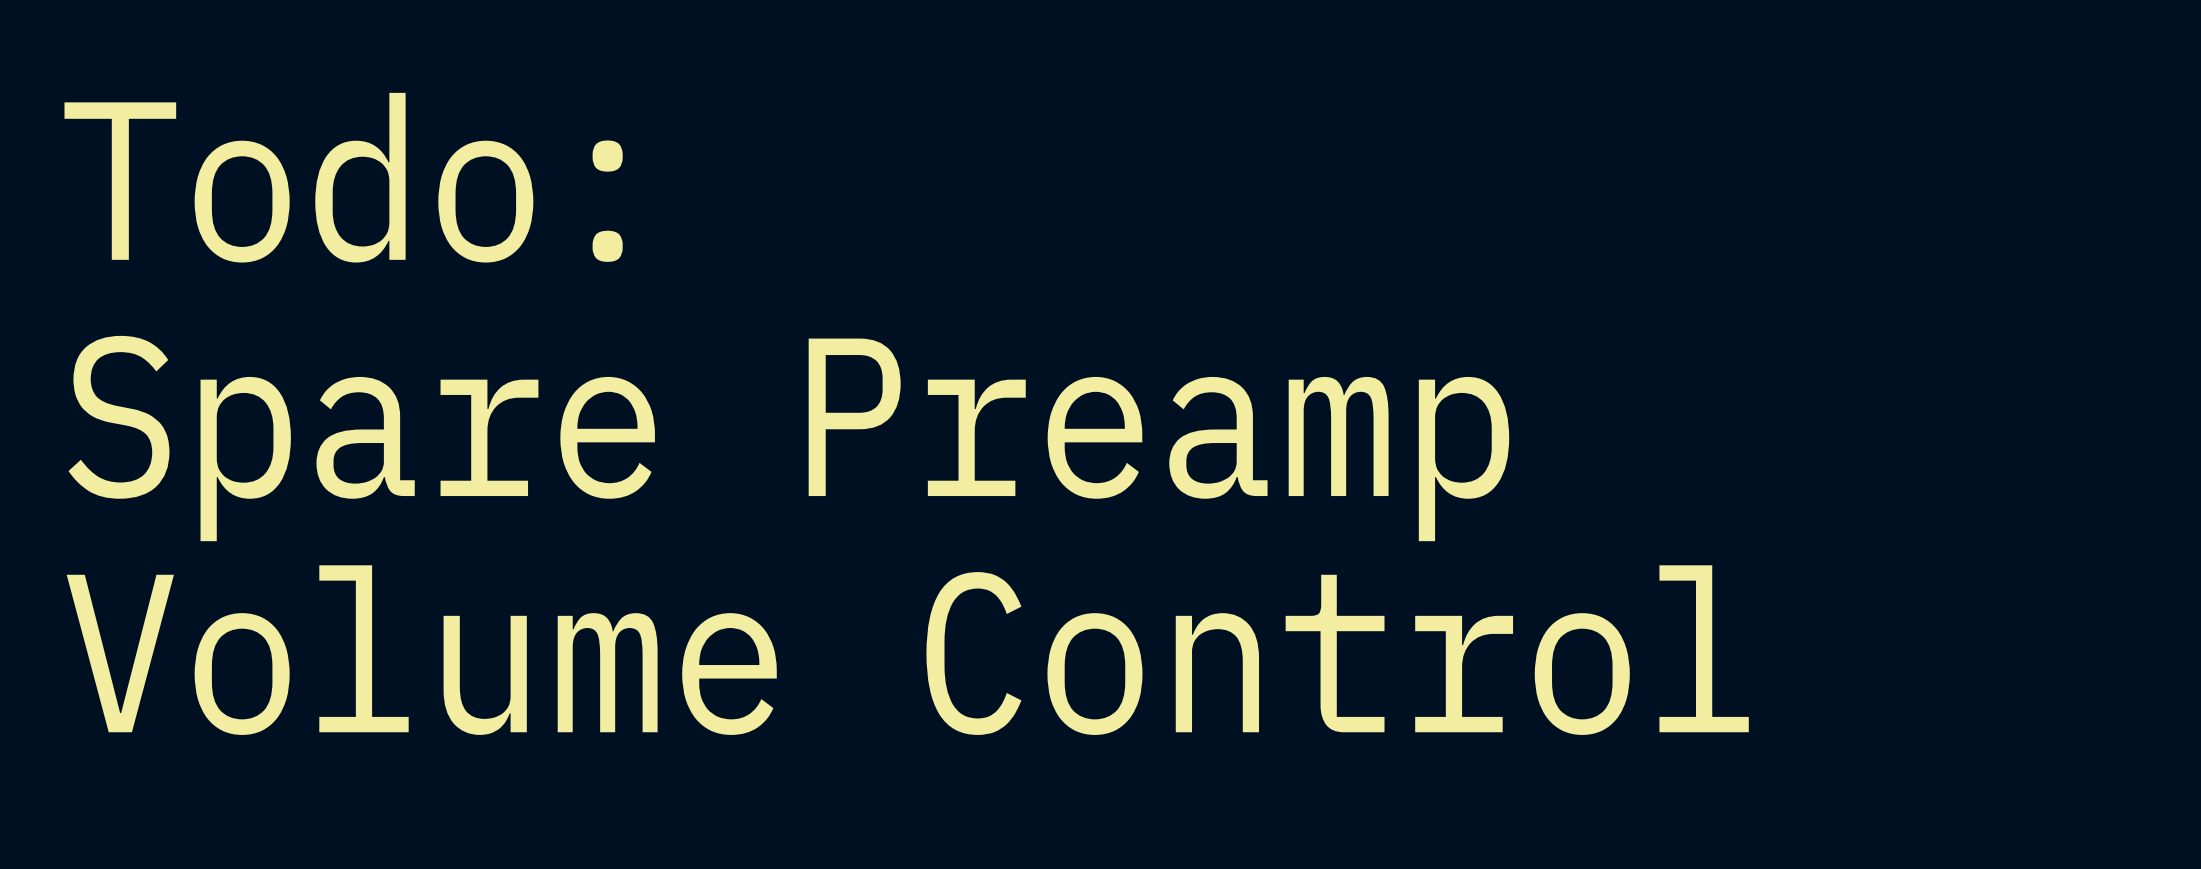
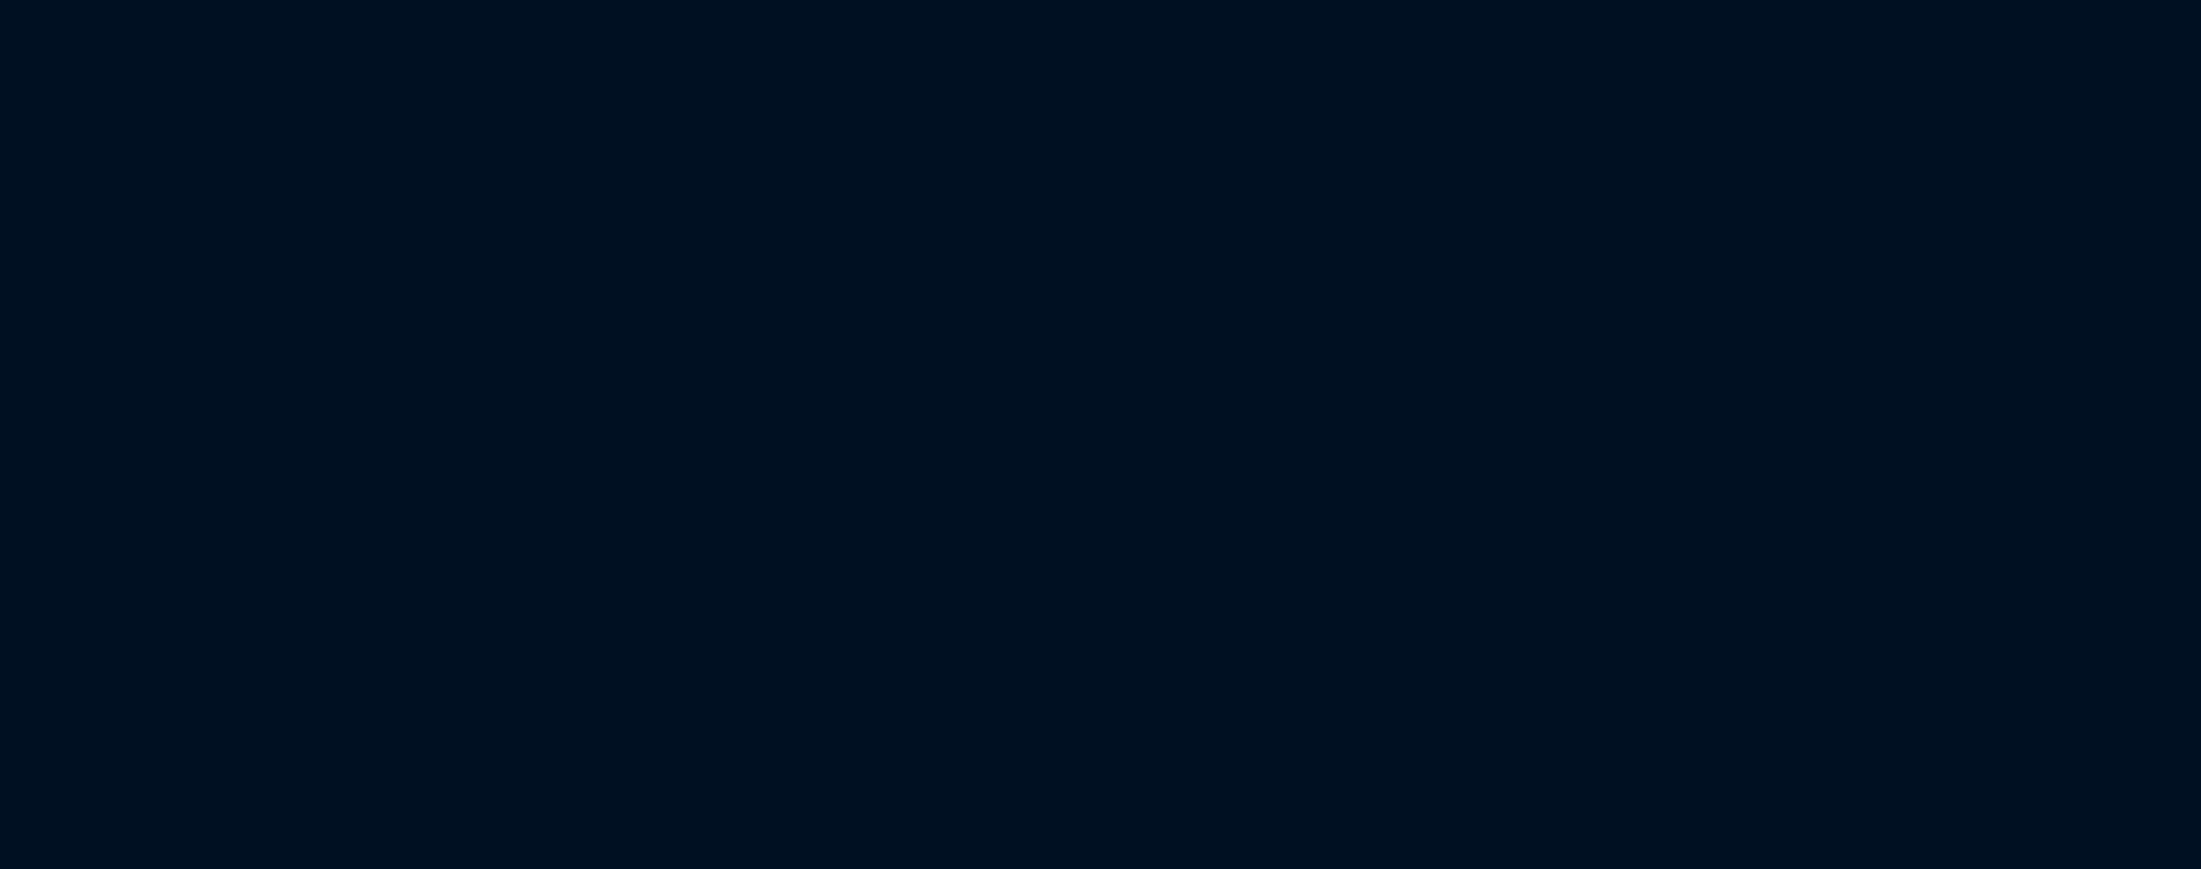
text: Todo: (343, 177) -> none
text: Spare Preamp (788, 438) -> none
text: Volume Control (907, 650) -> none

